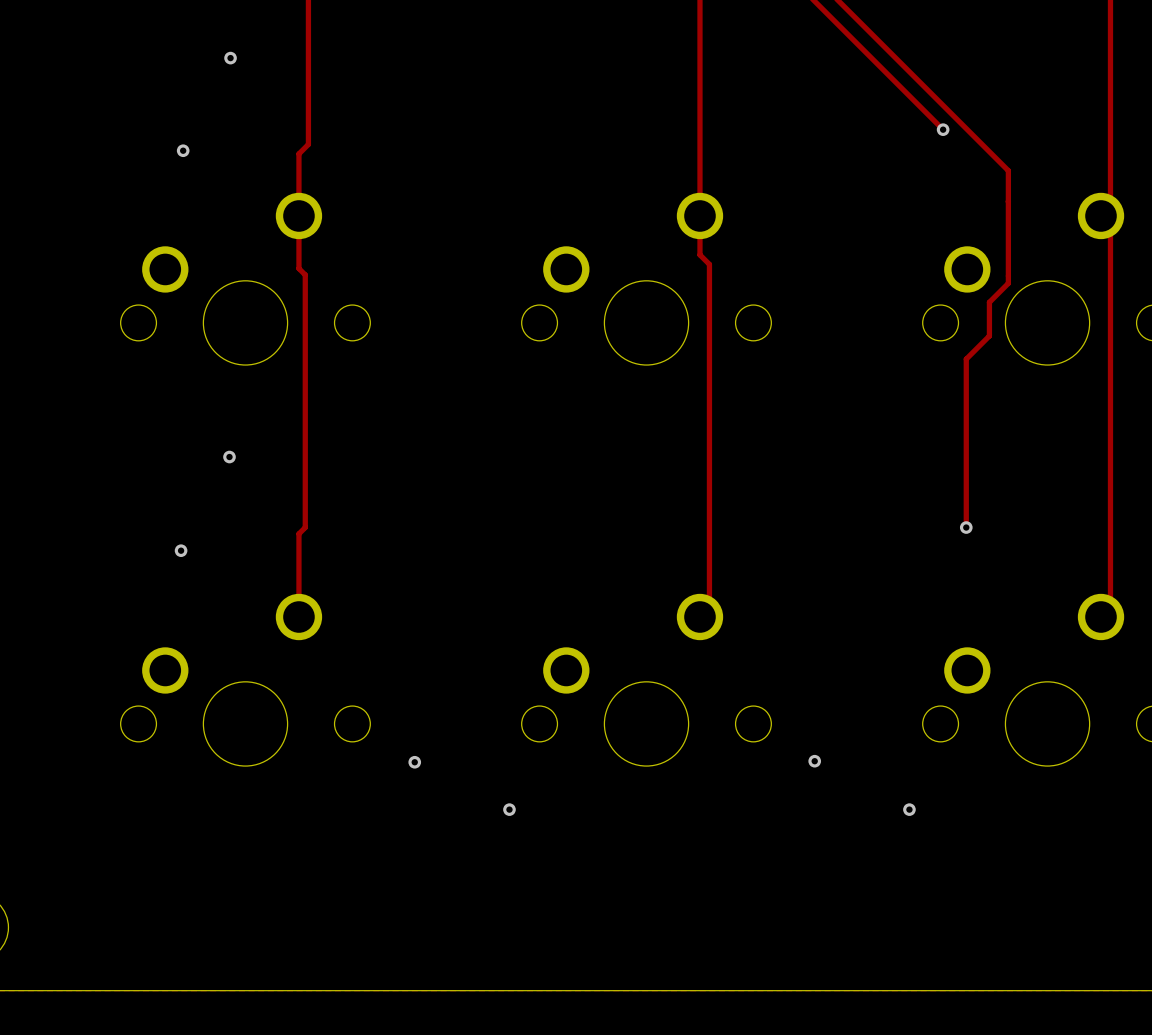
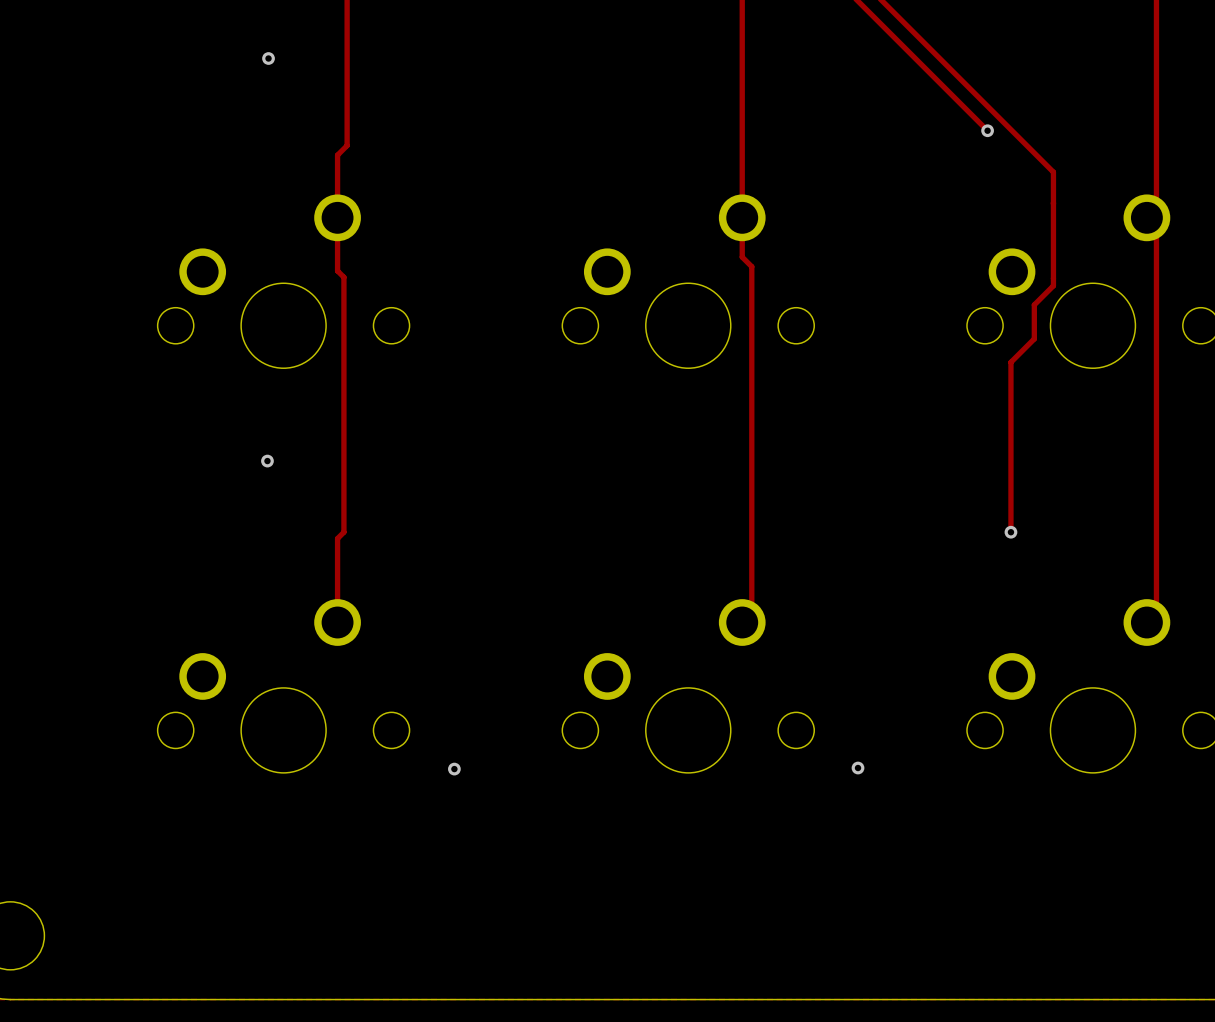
via: (183, 150) -> none
via: (181, 550) -> none
via: (509, 809) -> none
via: (909, 809) -> none

